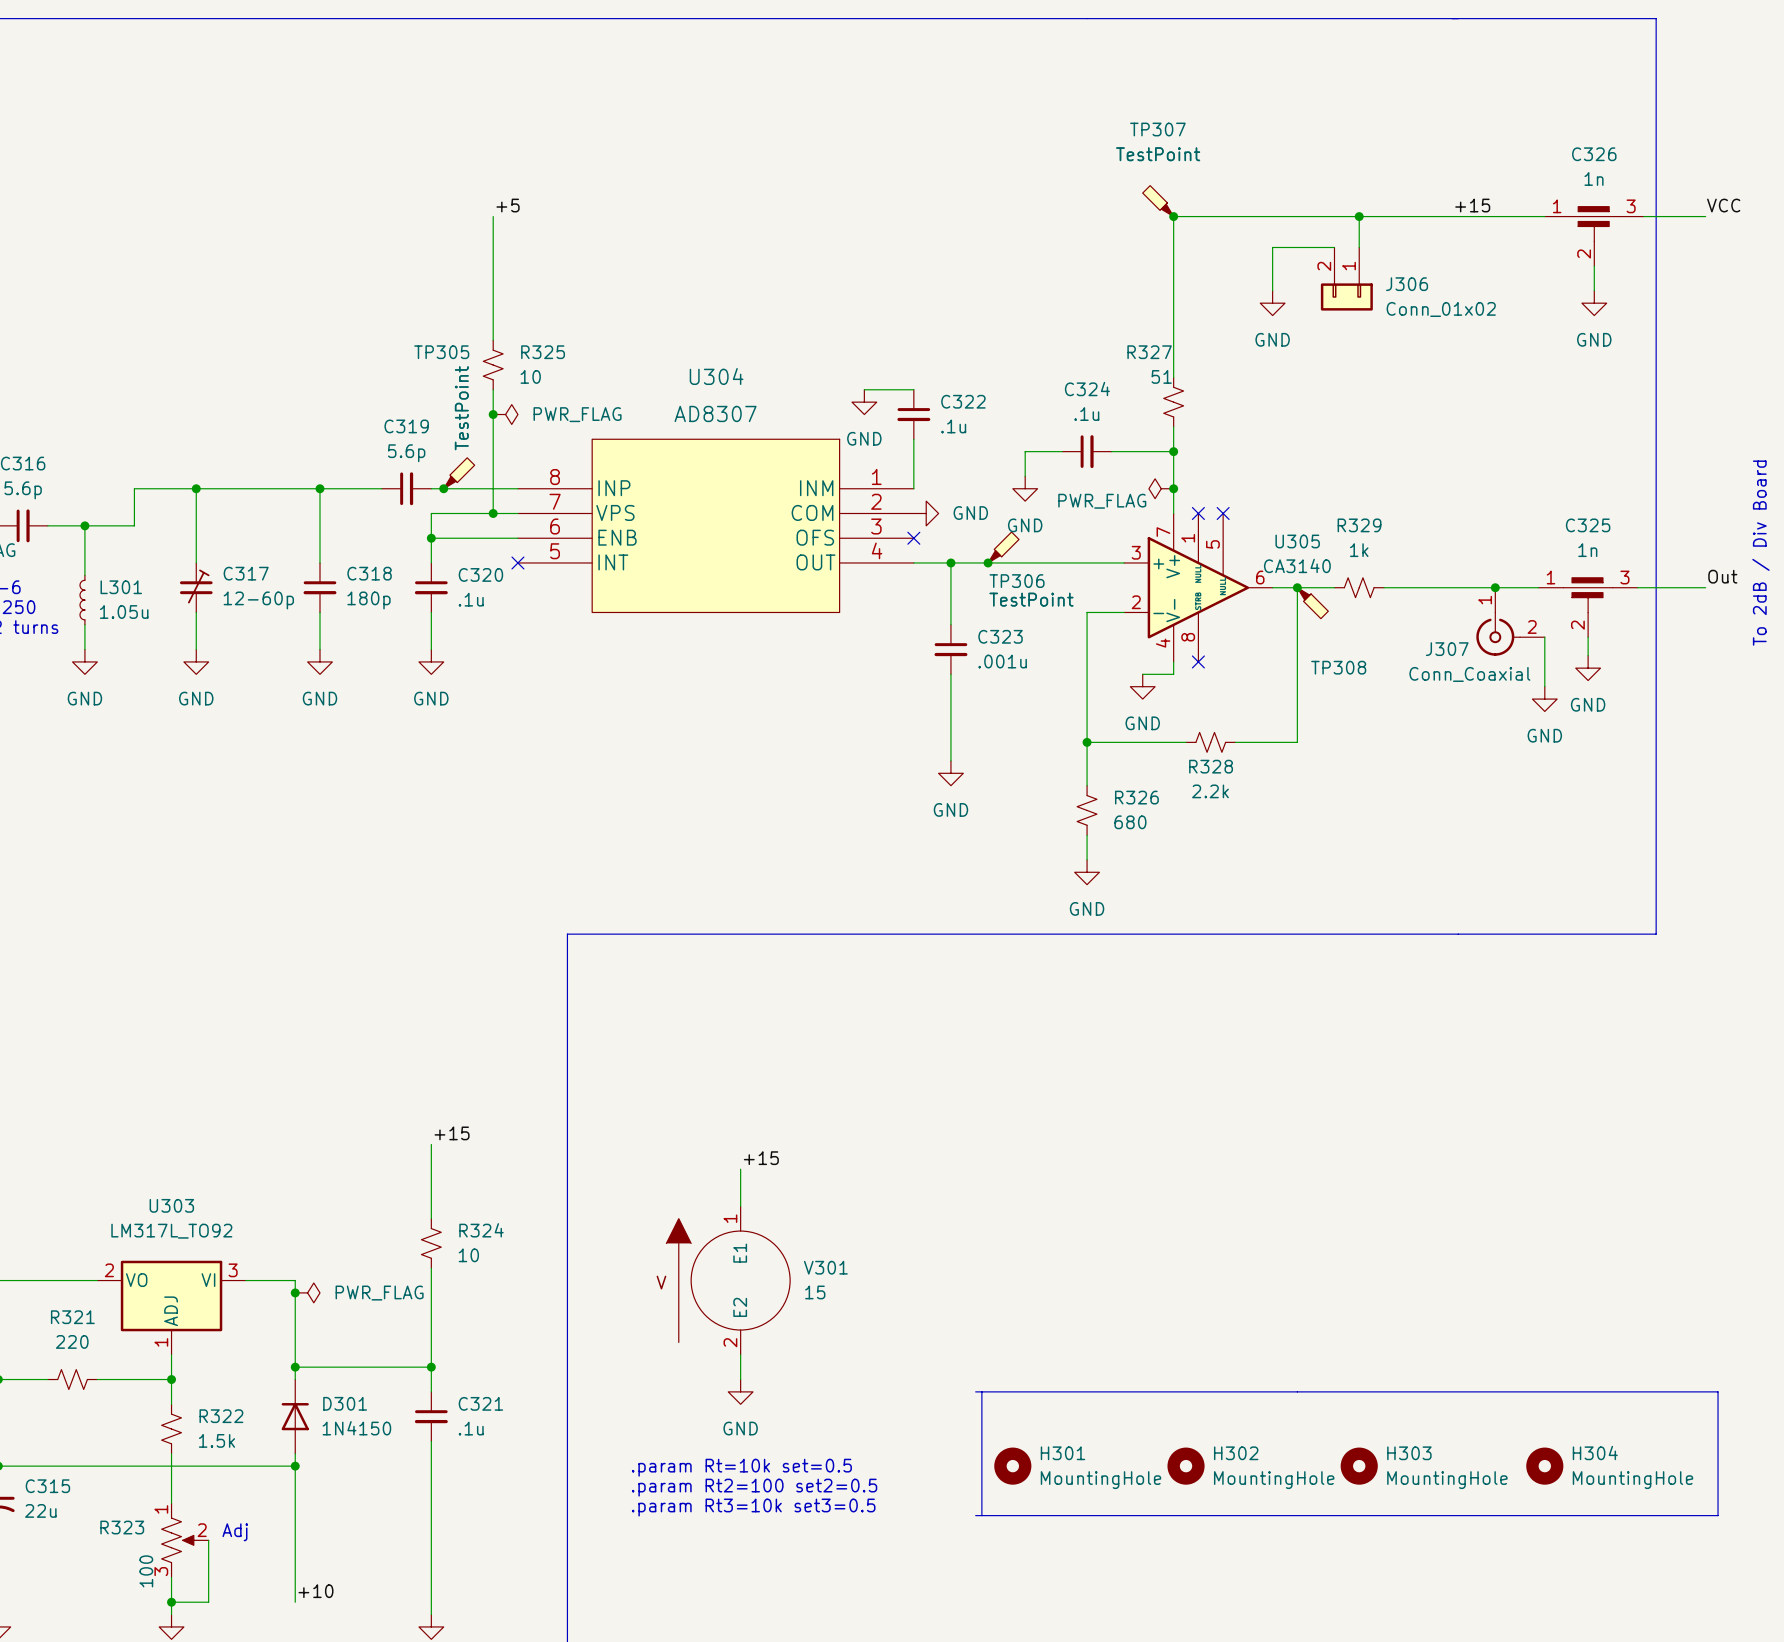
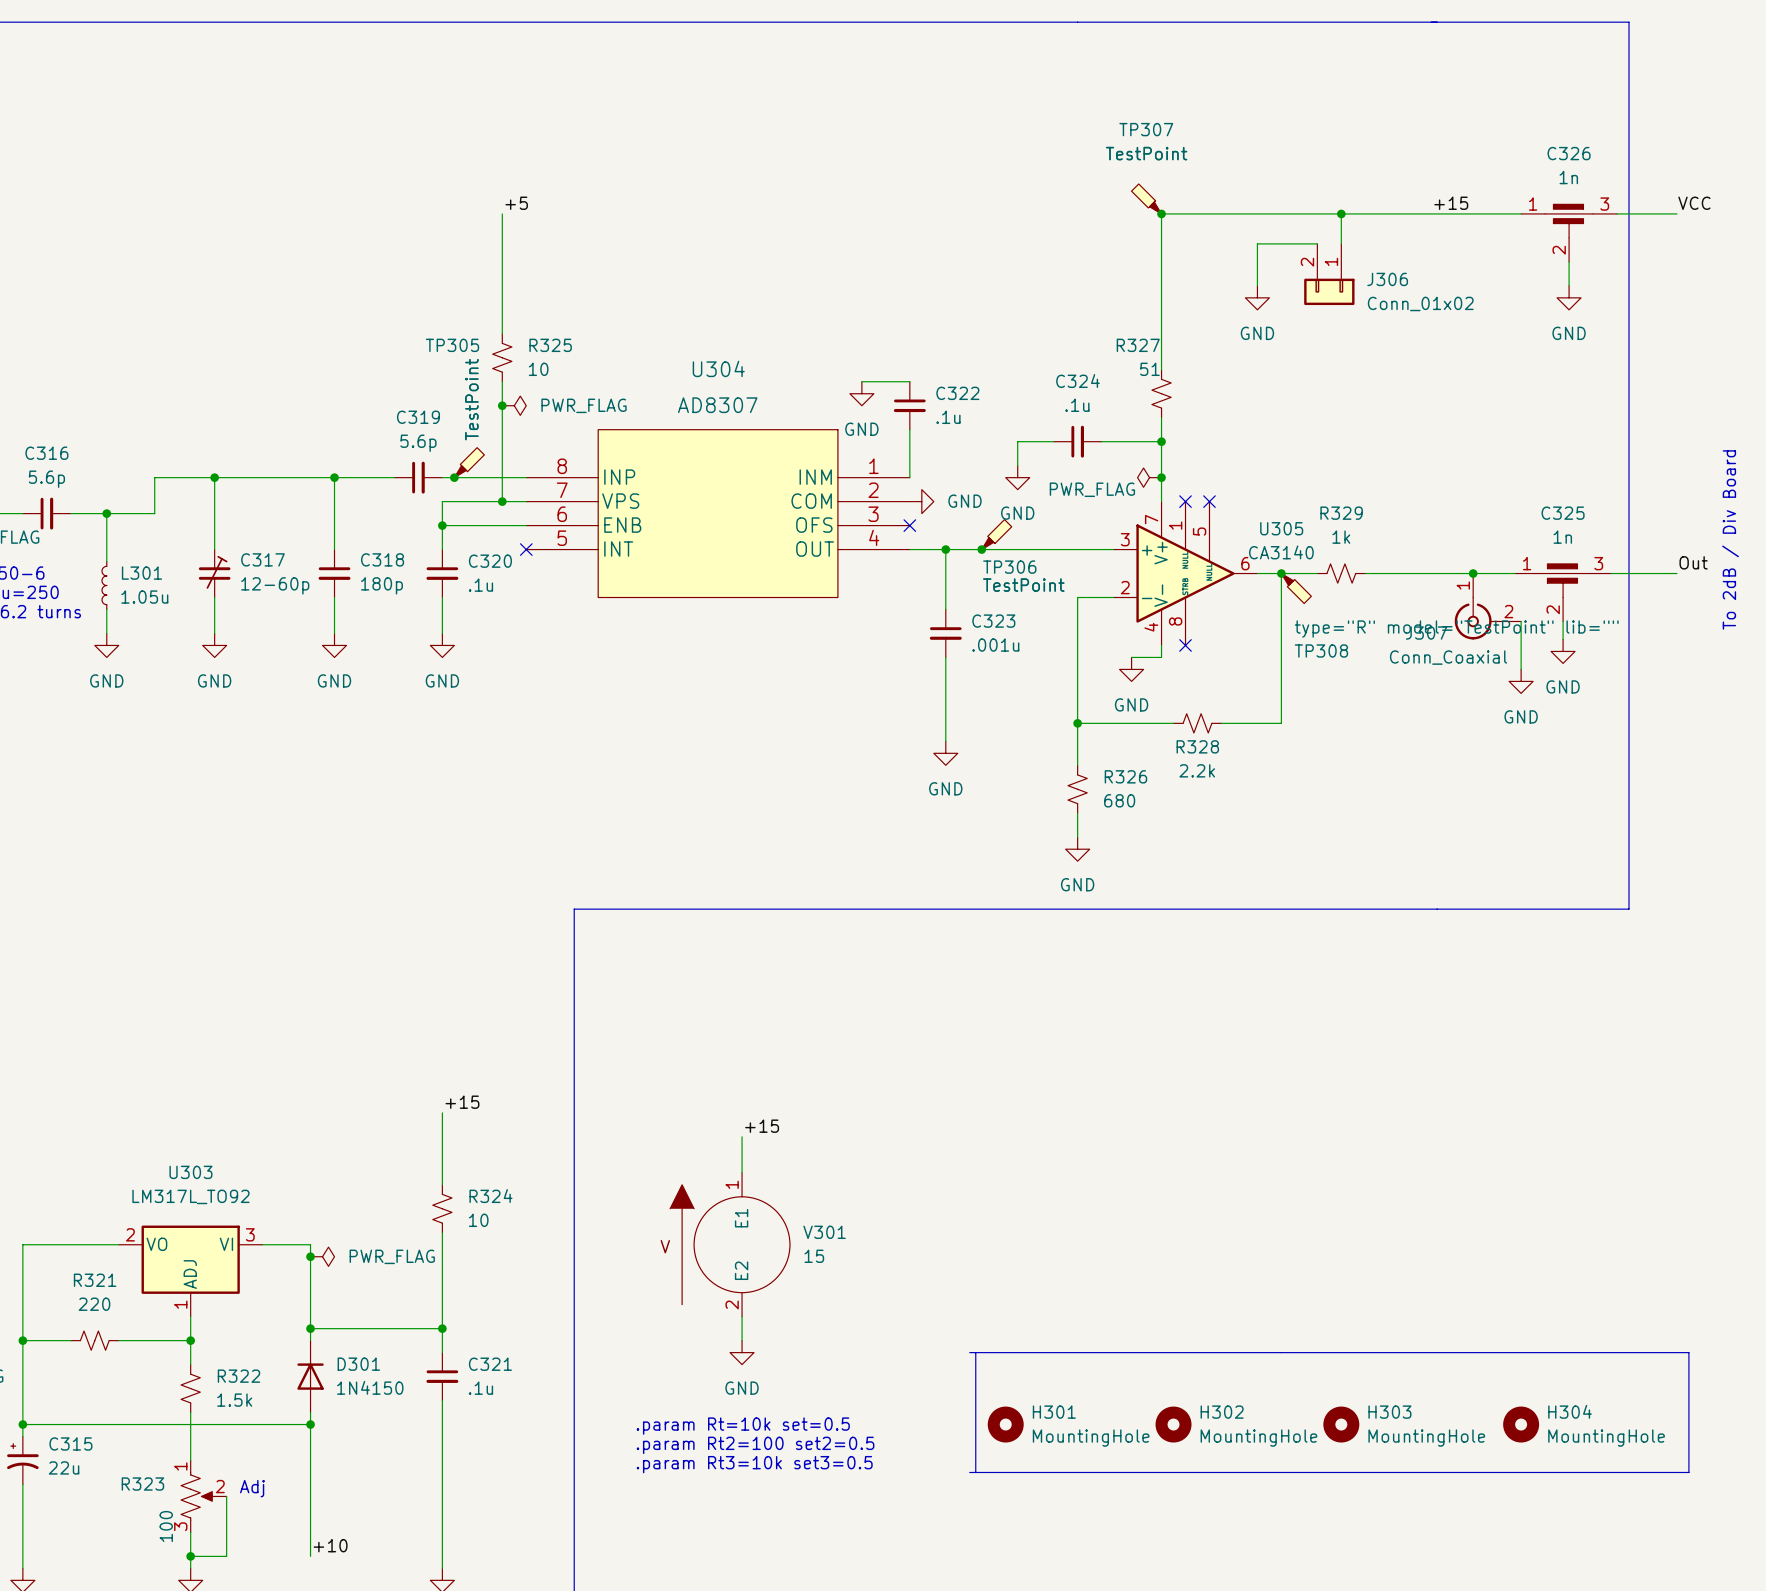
TP308 value: none -> type="R" model="TestPoint" lib="" (1456, 629)

